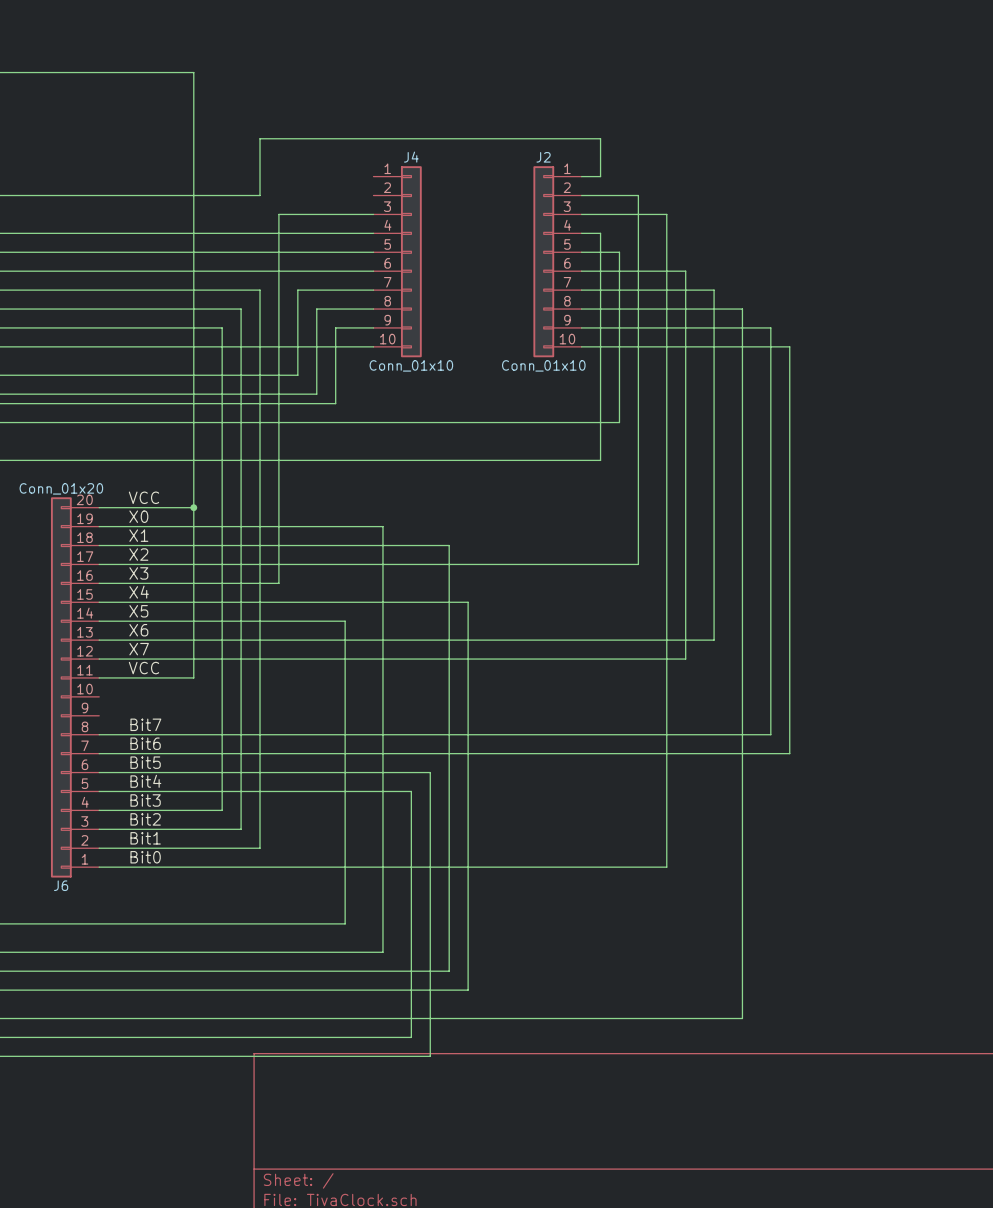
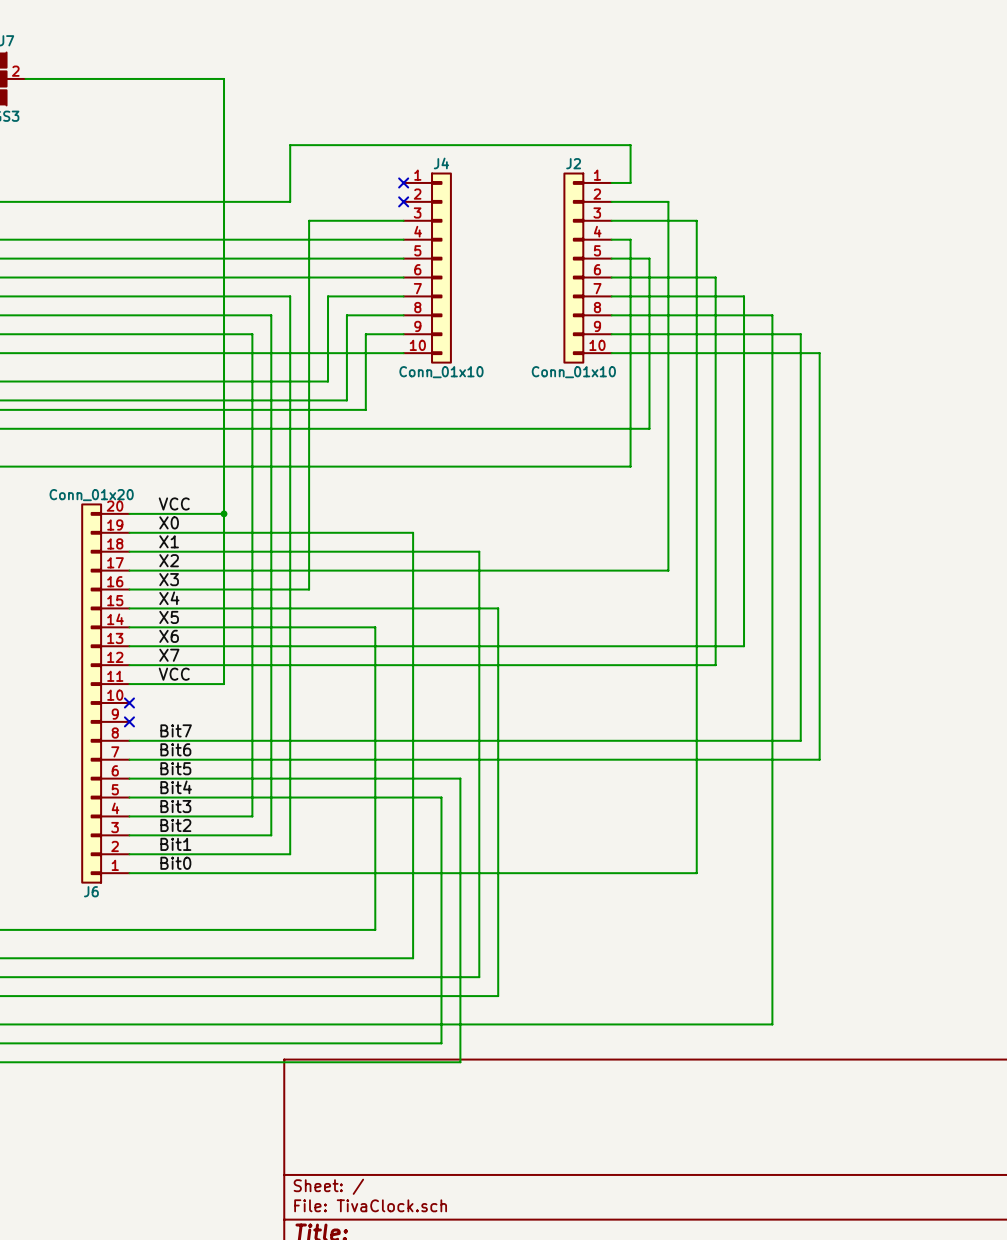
no-connect mark: none -> (403, 182)
no-connect mark: none -> (403, 201)
no-connect mark: none -> (129, 702)
no-connect mark: none -> (129, 721)

